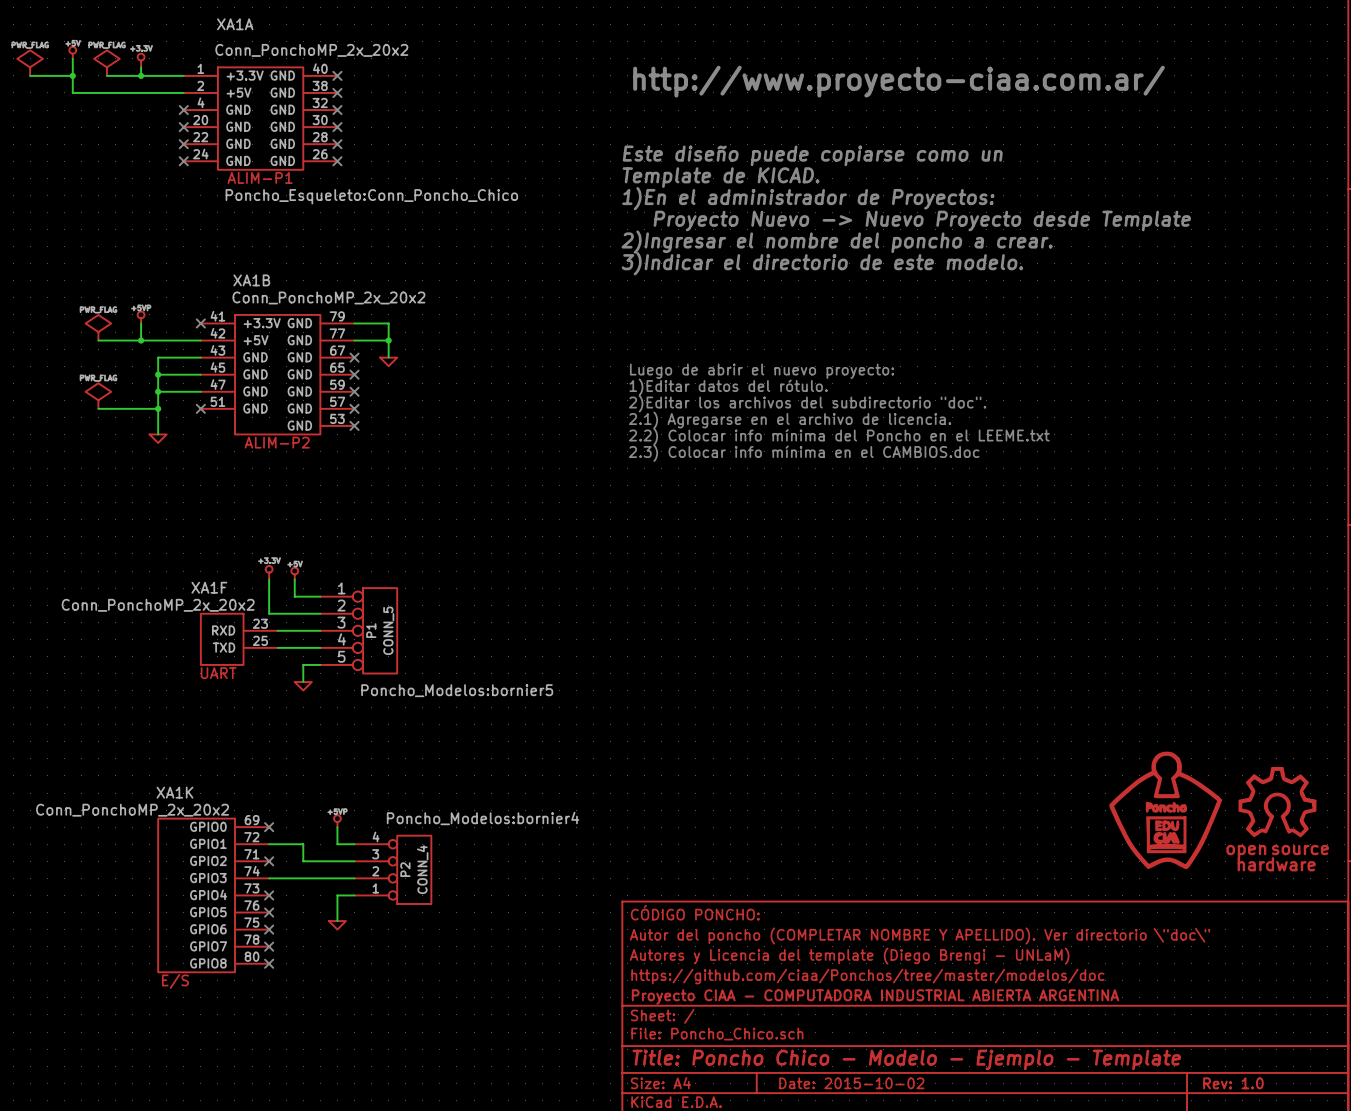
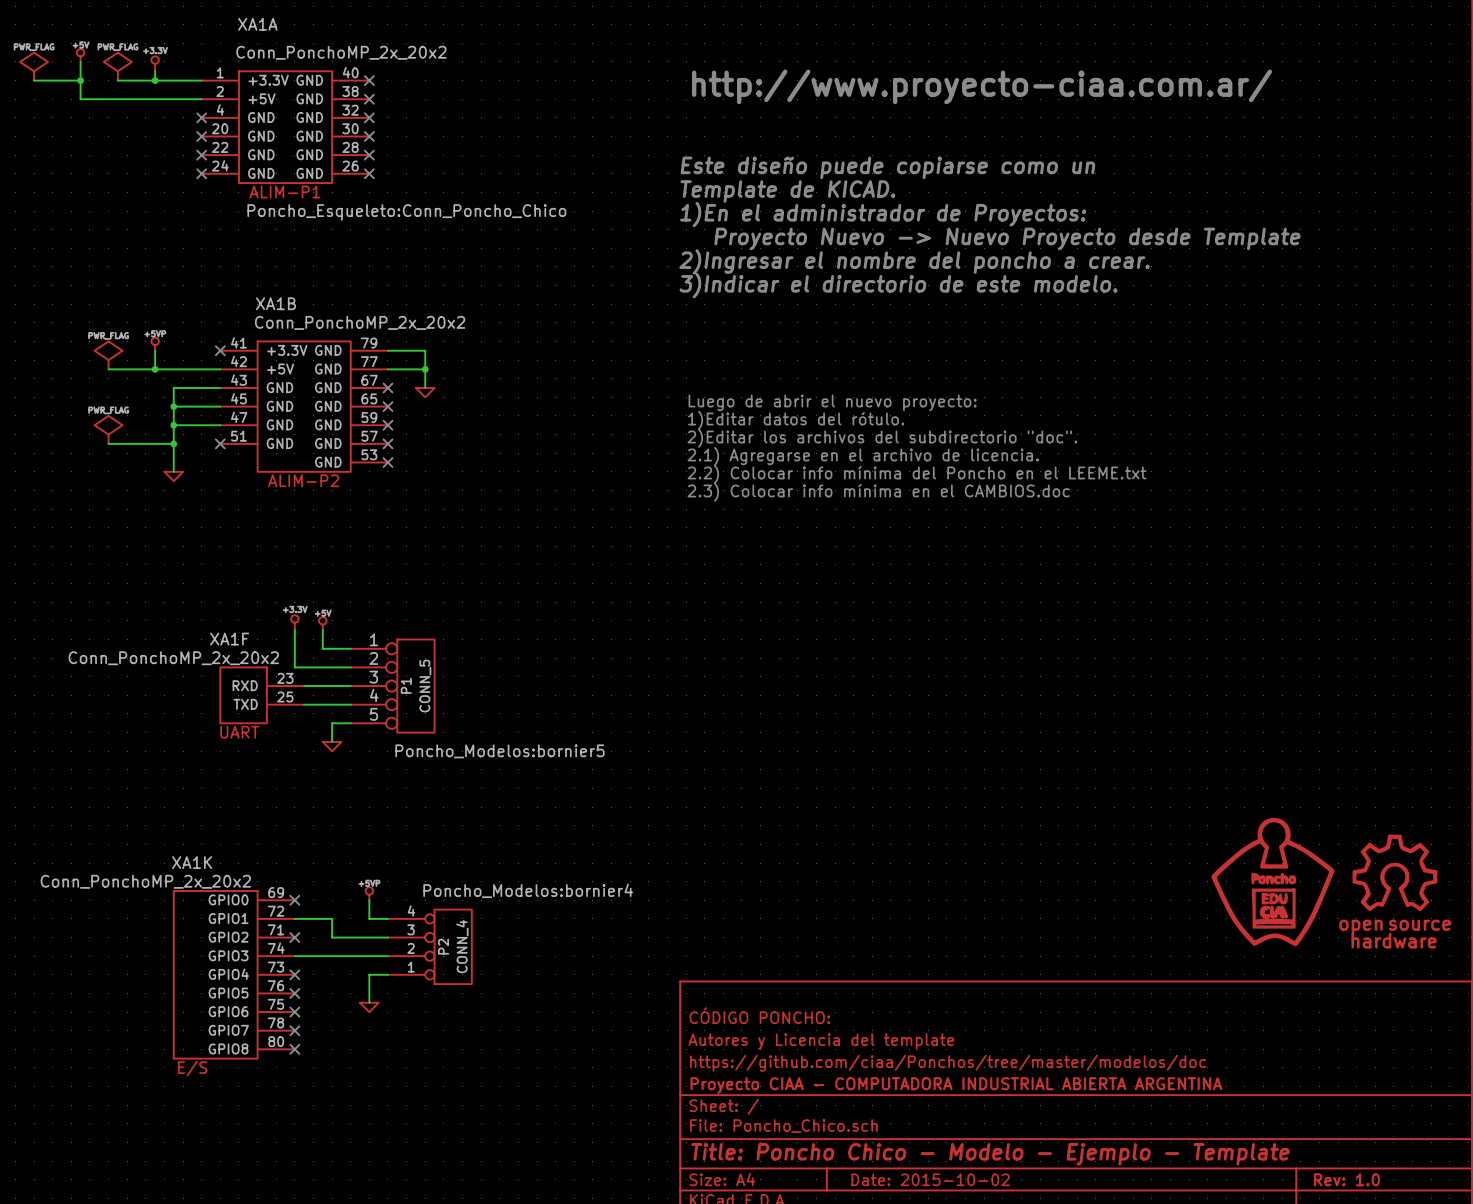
title block: CÓDIGO PONCHO: (695, 912) -> none
title block: Autor del poncho (COMPLETAR NOMBRE Y APELLIDO). Ver directorio \"doc\" (919, 935) -> CÓDIGO PONCHO: (759, 1015)
title block: Autores y Licencia del template (Diego Brengi - UNLaM) (849, 956) -> Autores y Licencia del template (821, 1041)

